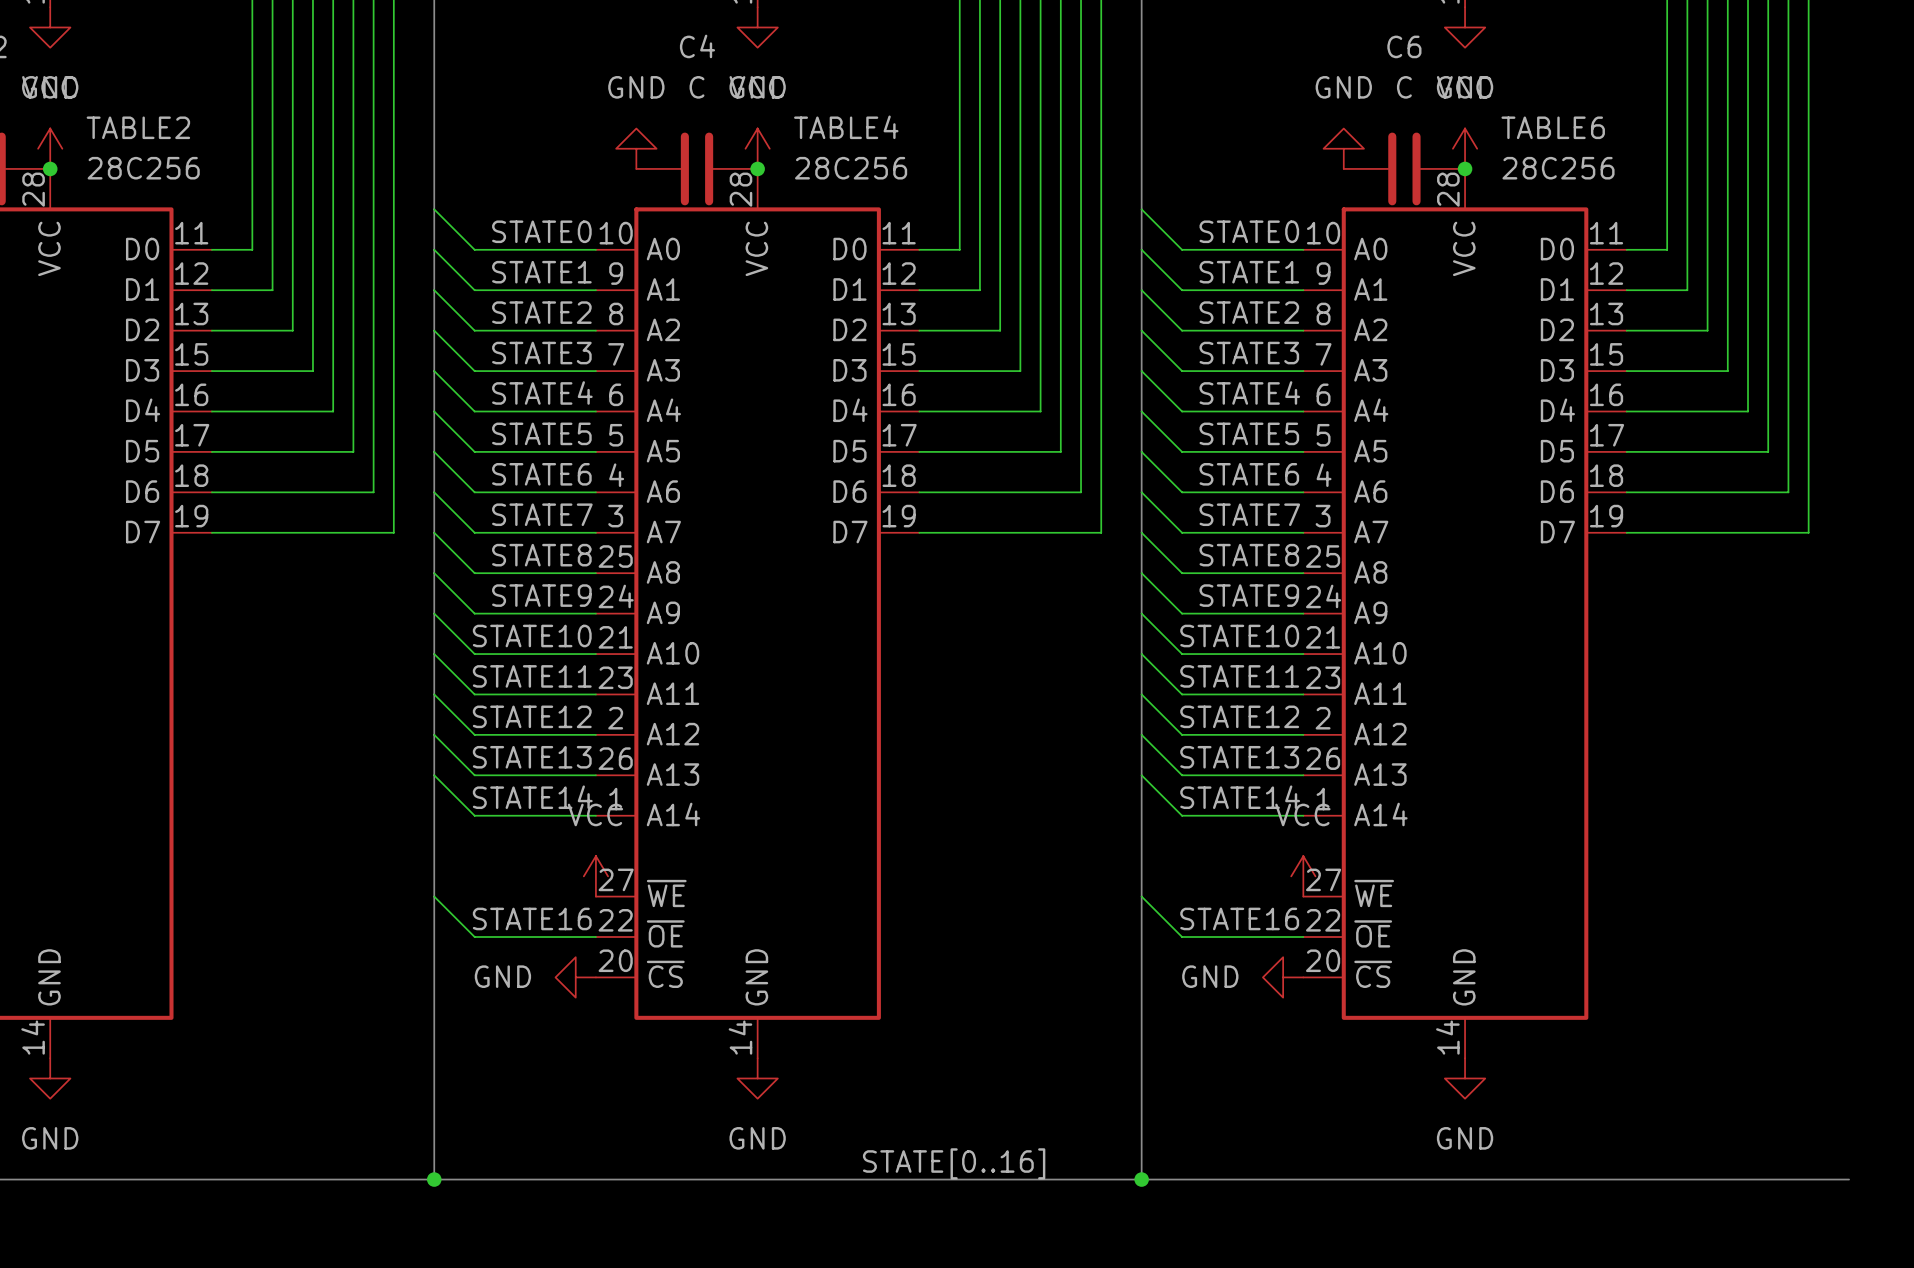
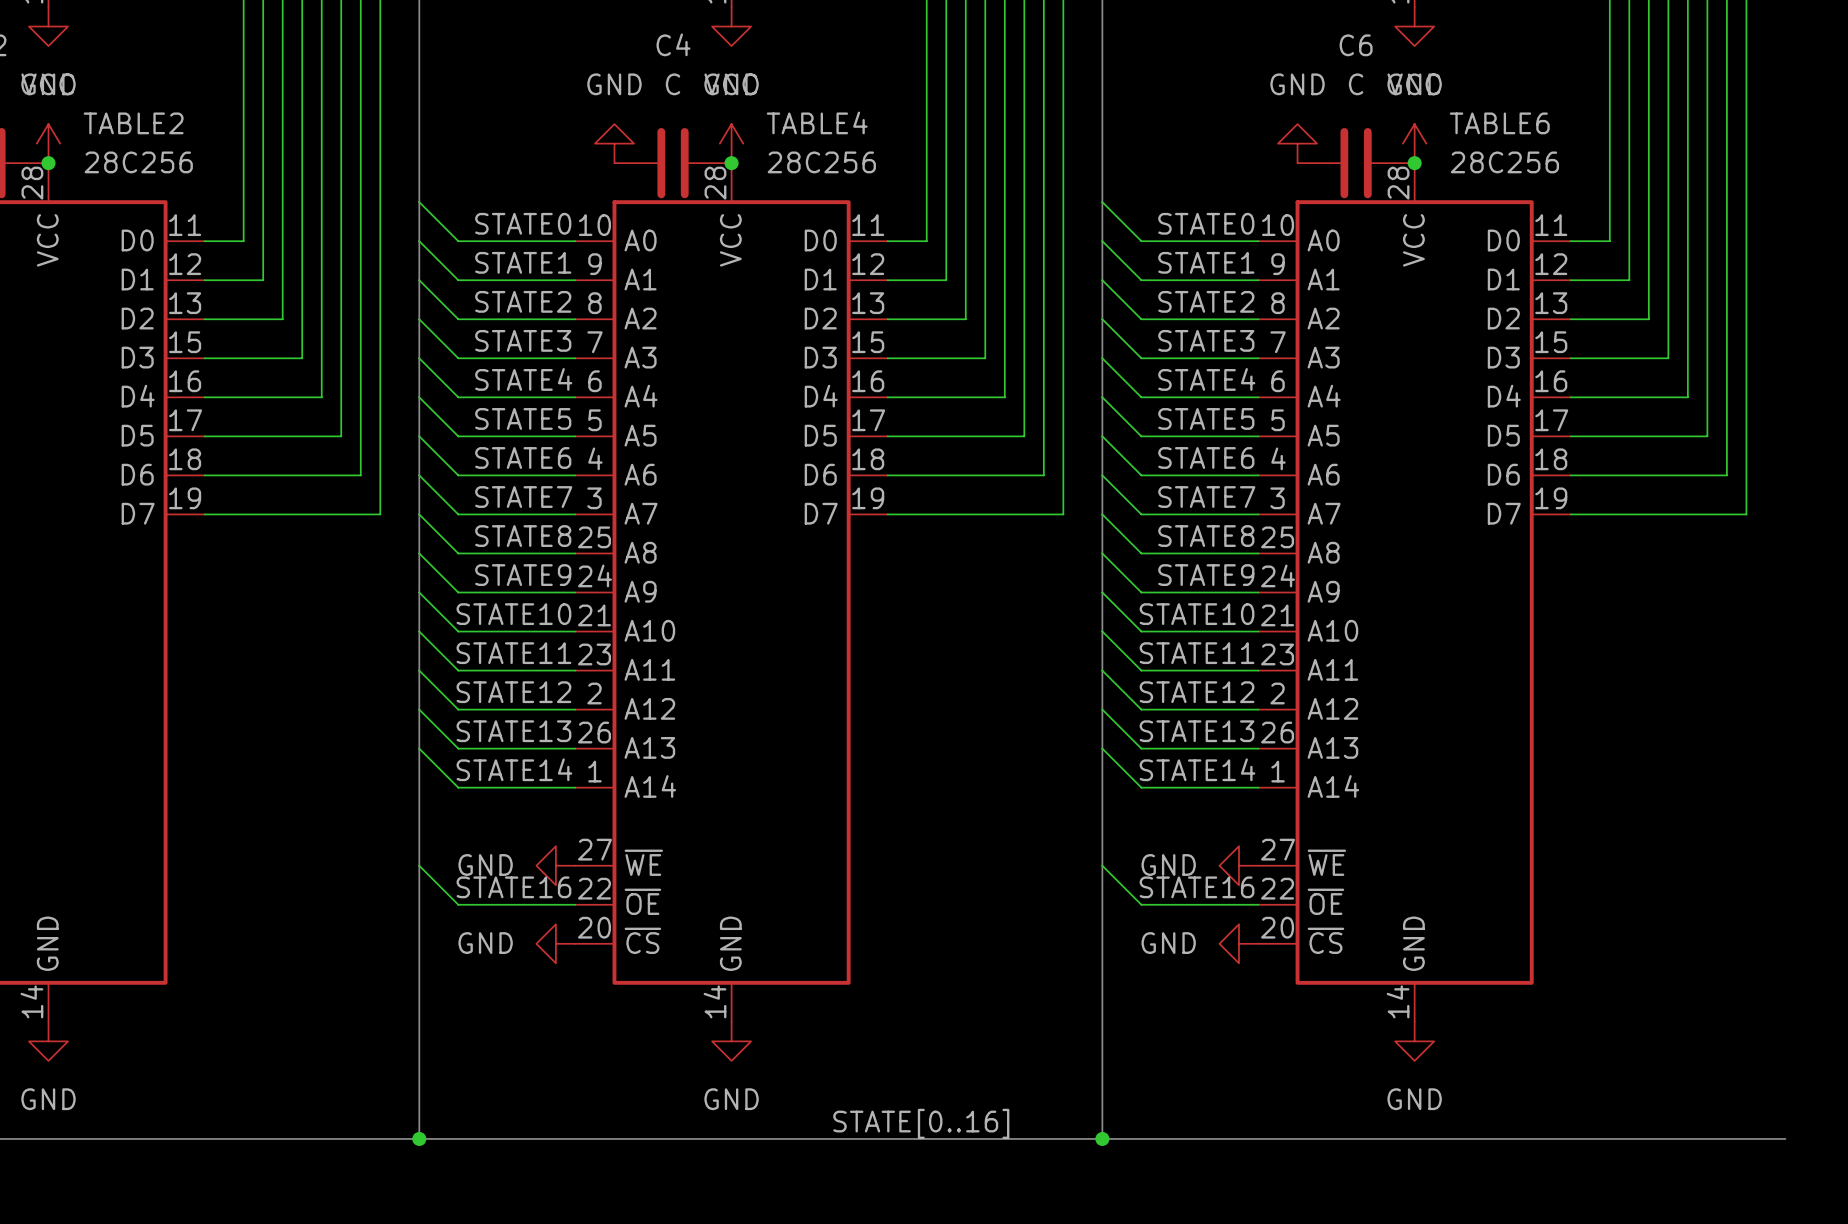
power symbol: VCC (595, 876) -> none
power symbol: VCC (1303, 876) -> none
power symbol: none -> GND (555, 865)
power symbol: none -> GND (1238, 865)

